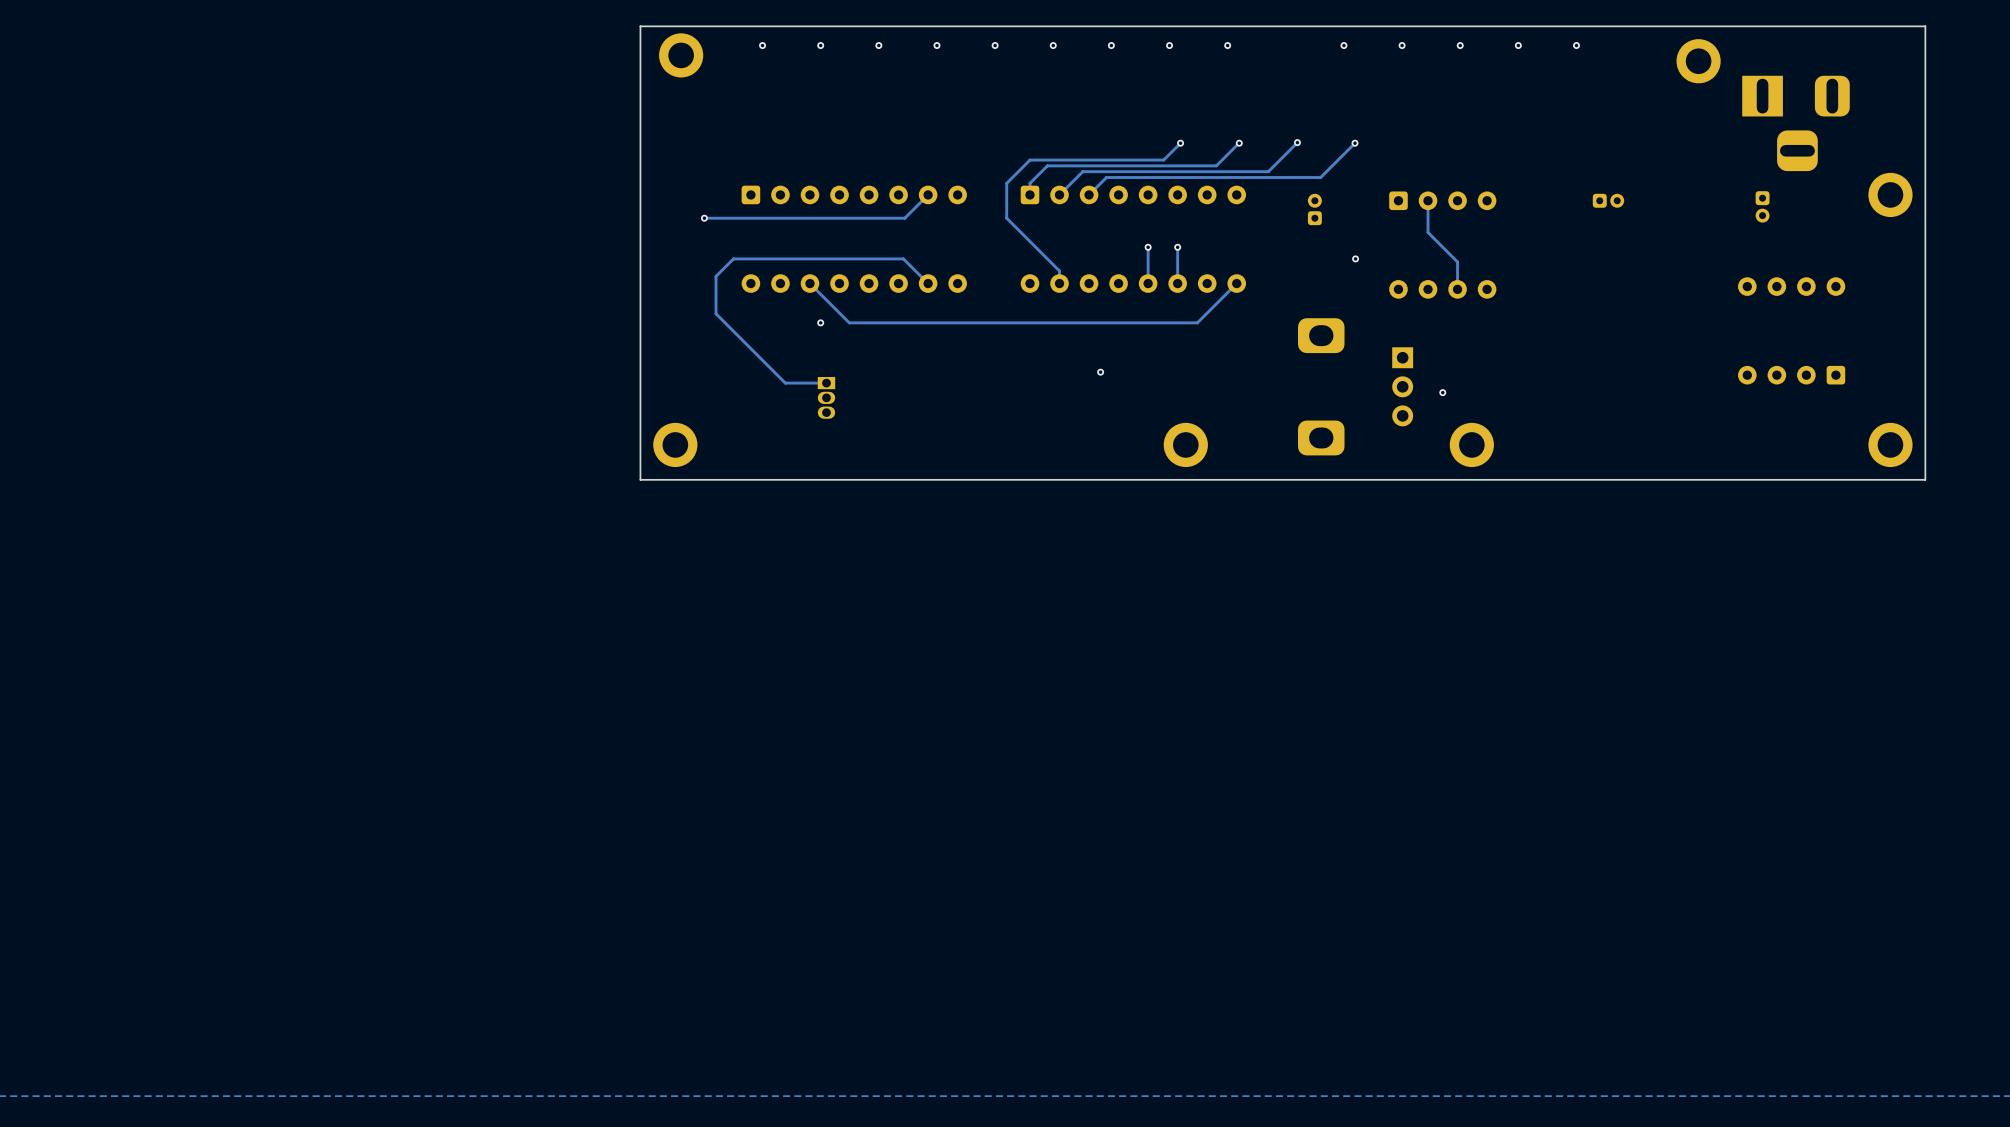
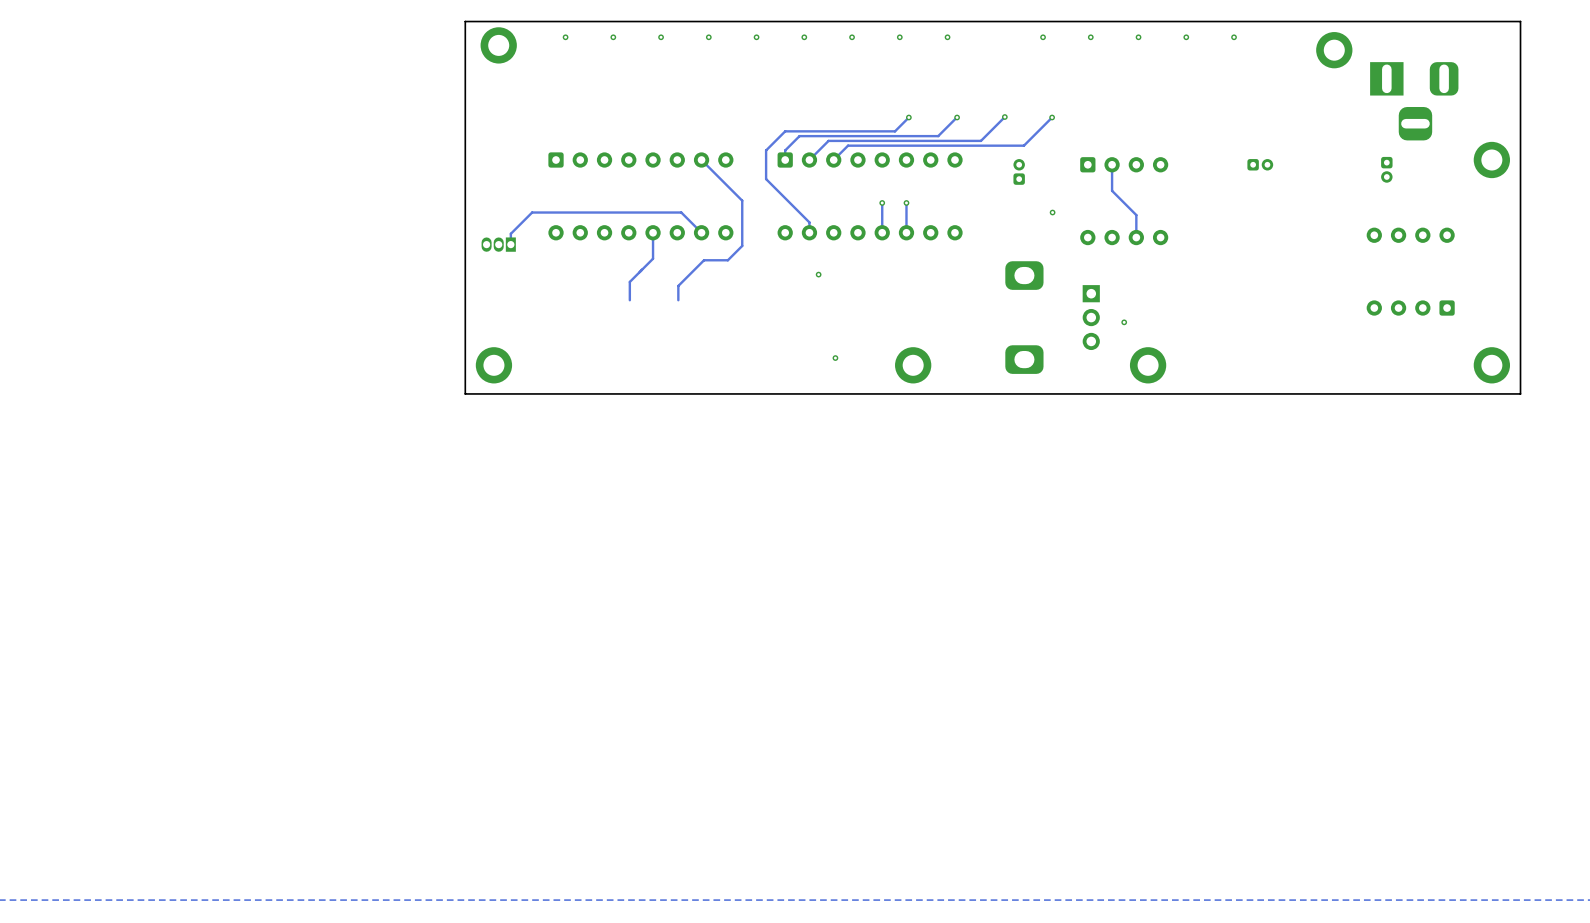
track: (928, 194) (904, 218) (704, 218) -> (701, 160) (742, 200) (742, 245) (727, 260) (704, 260) (678, 285) (678, 300)
via: (704, 218) -> none
track: (733, 258) (716, 276) (716, 313) (785, 383) (826, 383) -> (541, 212) (532, 212) (510, 233) (510, 244)
track: none -> (653, 232) (653, 258) (629, 281) (629, 300)
track: (1236, 283) (1197, 322) (849, 322) (809, 283) -> none
via: (820, 322) -> none
via: none -> (818, 274)
via: (1100, 372) -> none
part rotation: 0° (826, 397) -> 90° clockwise (498, 244)
part position: (826, 397) -> (498, 244)
via: none -> (835, 358)

